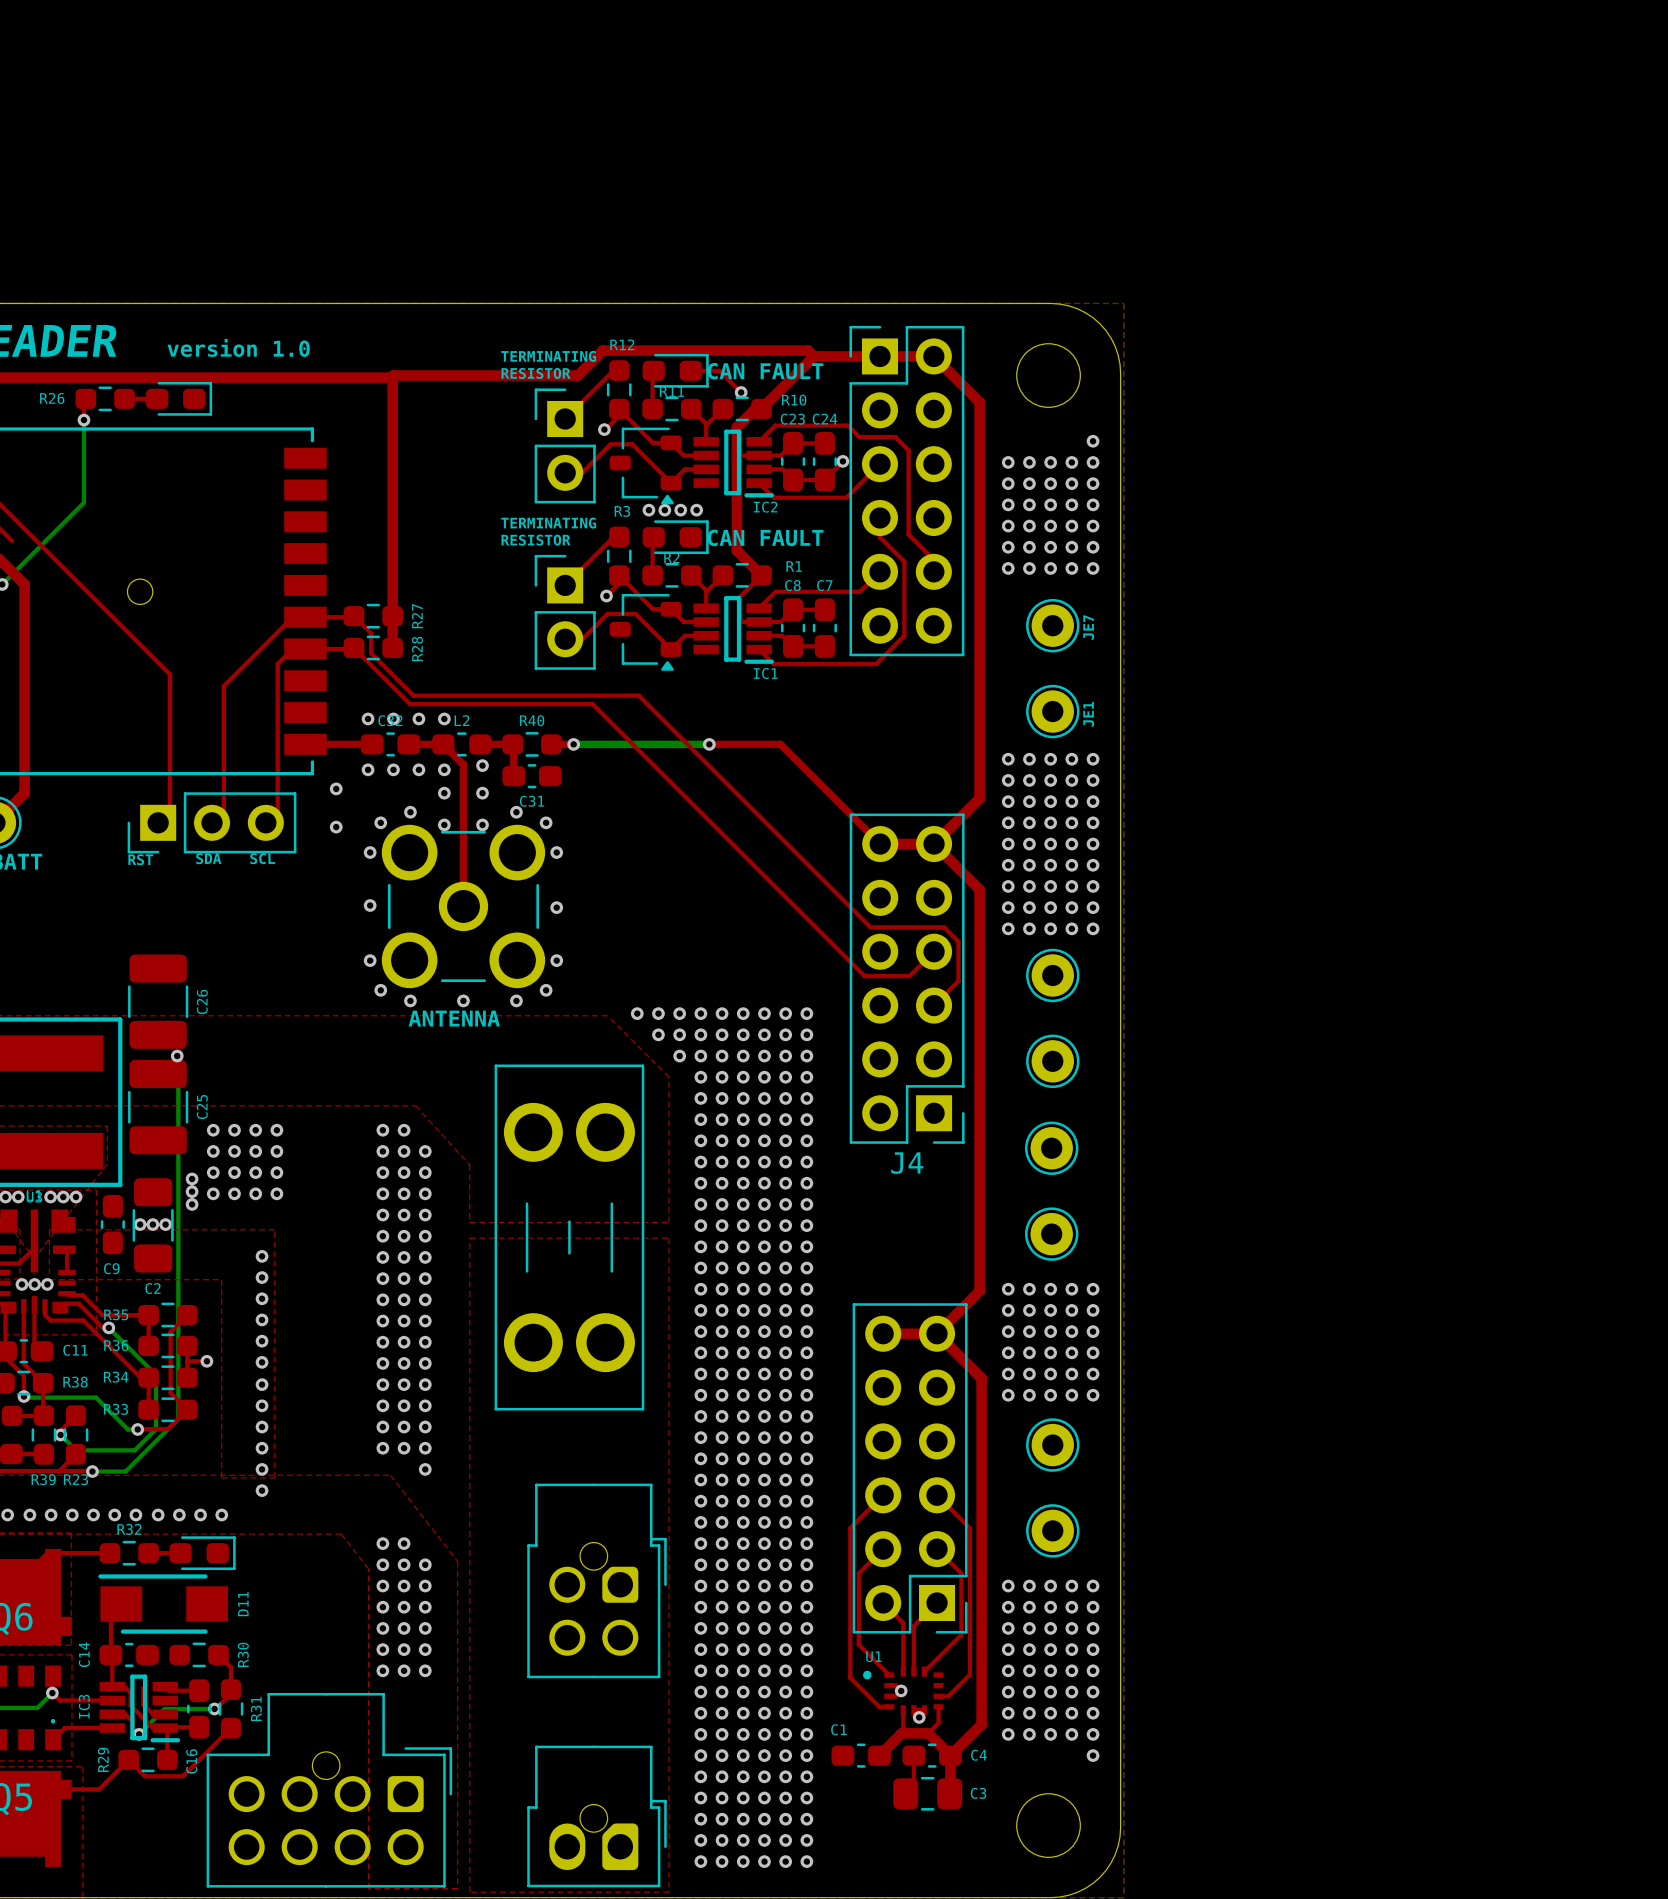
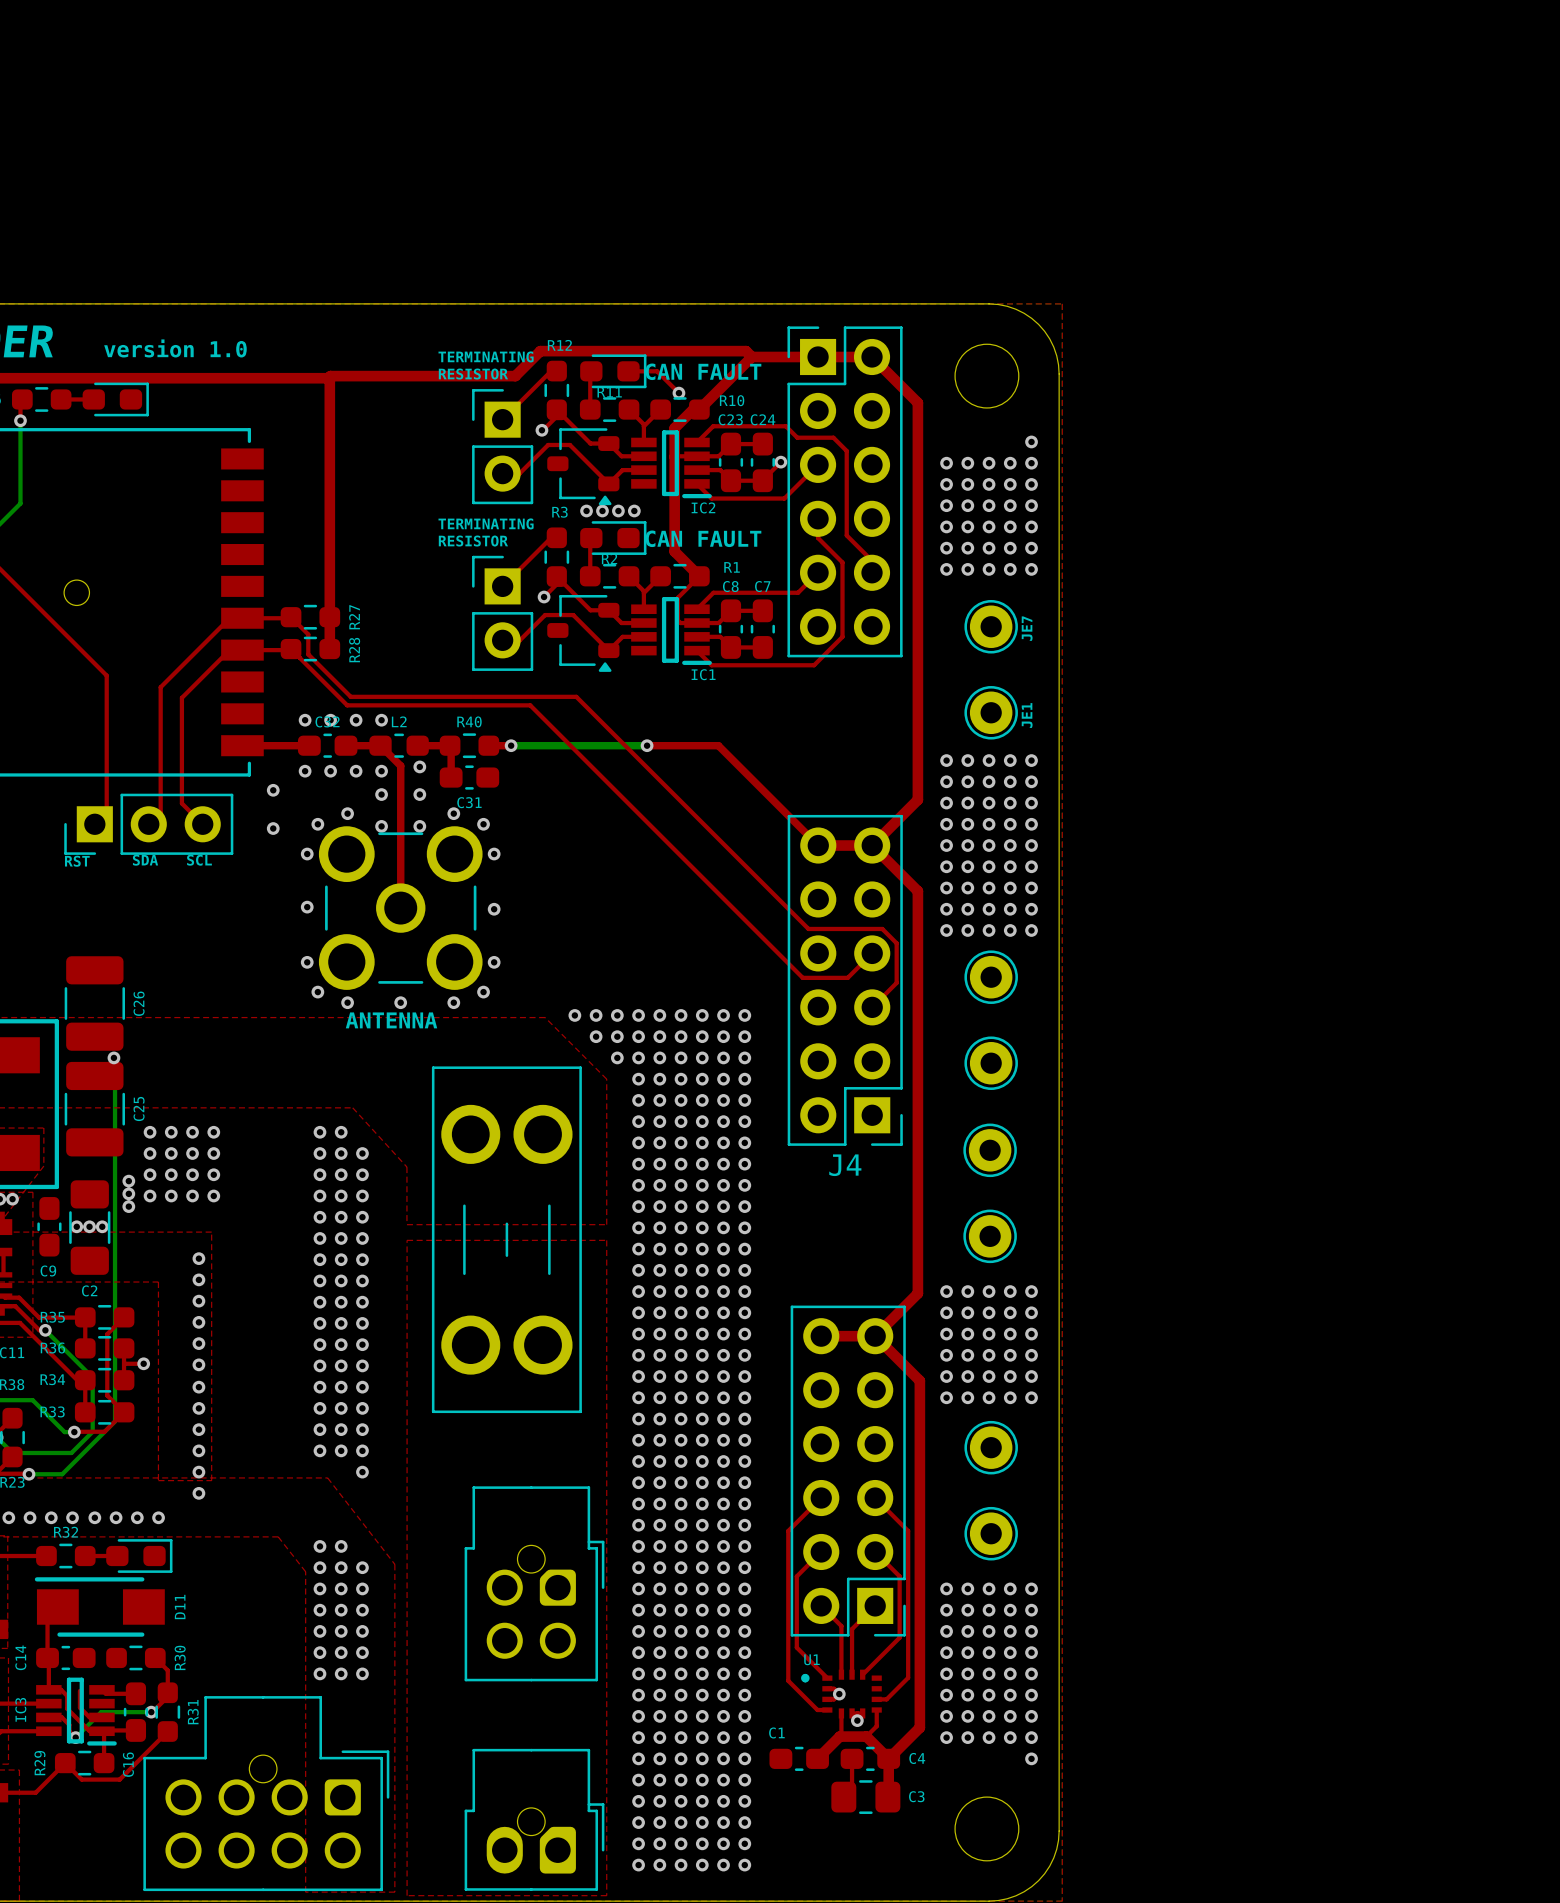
top track: (277, 664) (277, 810) (265, 822) -> (214, 665) (181, 697) (181, 803) (202, 824)

